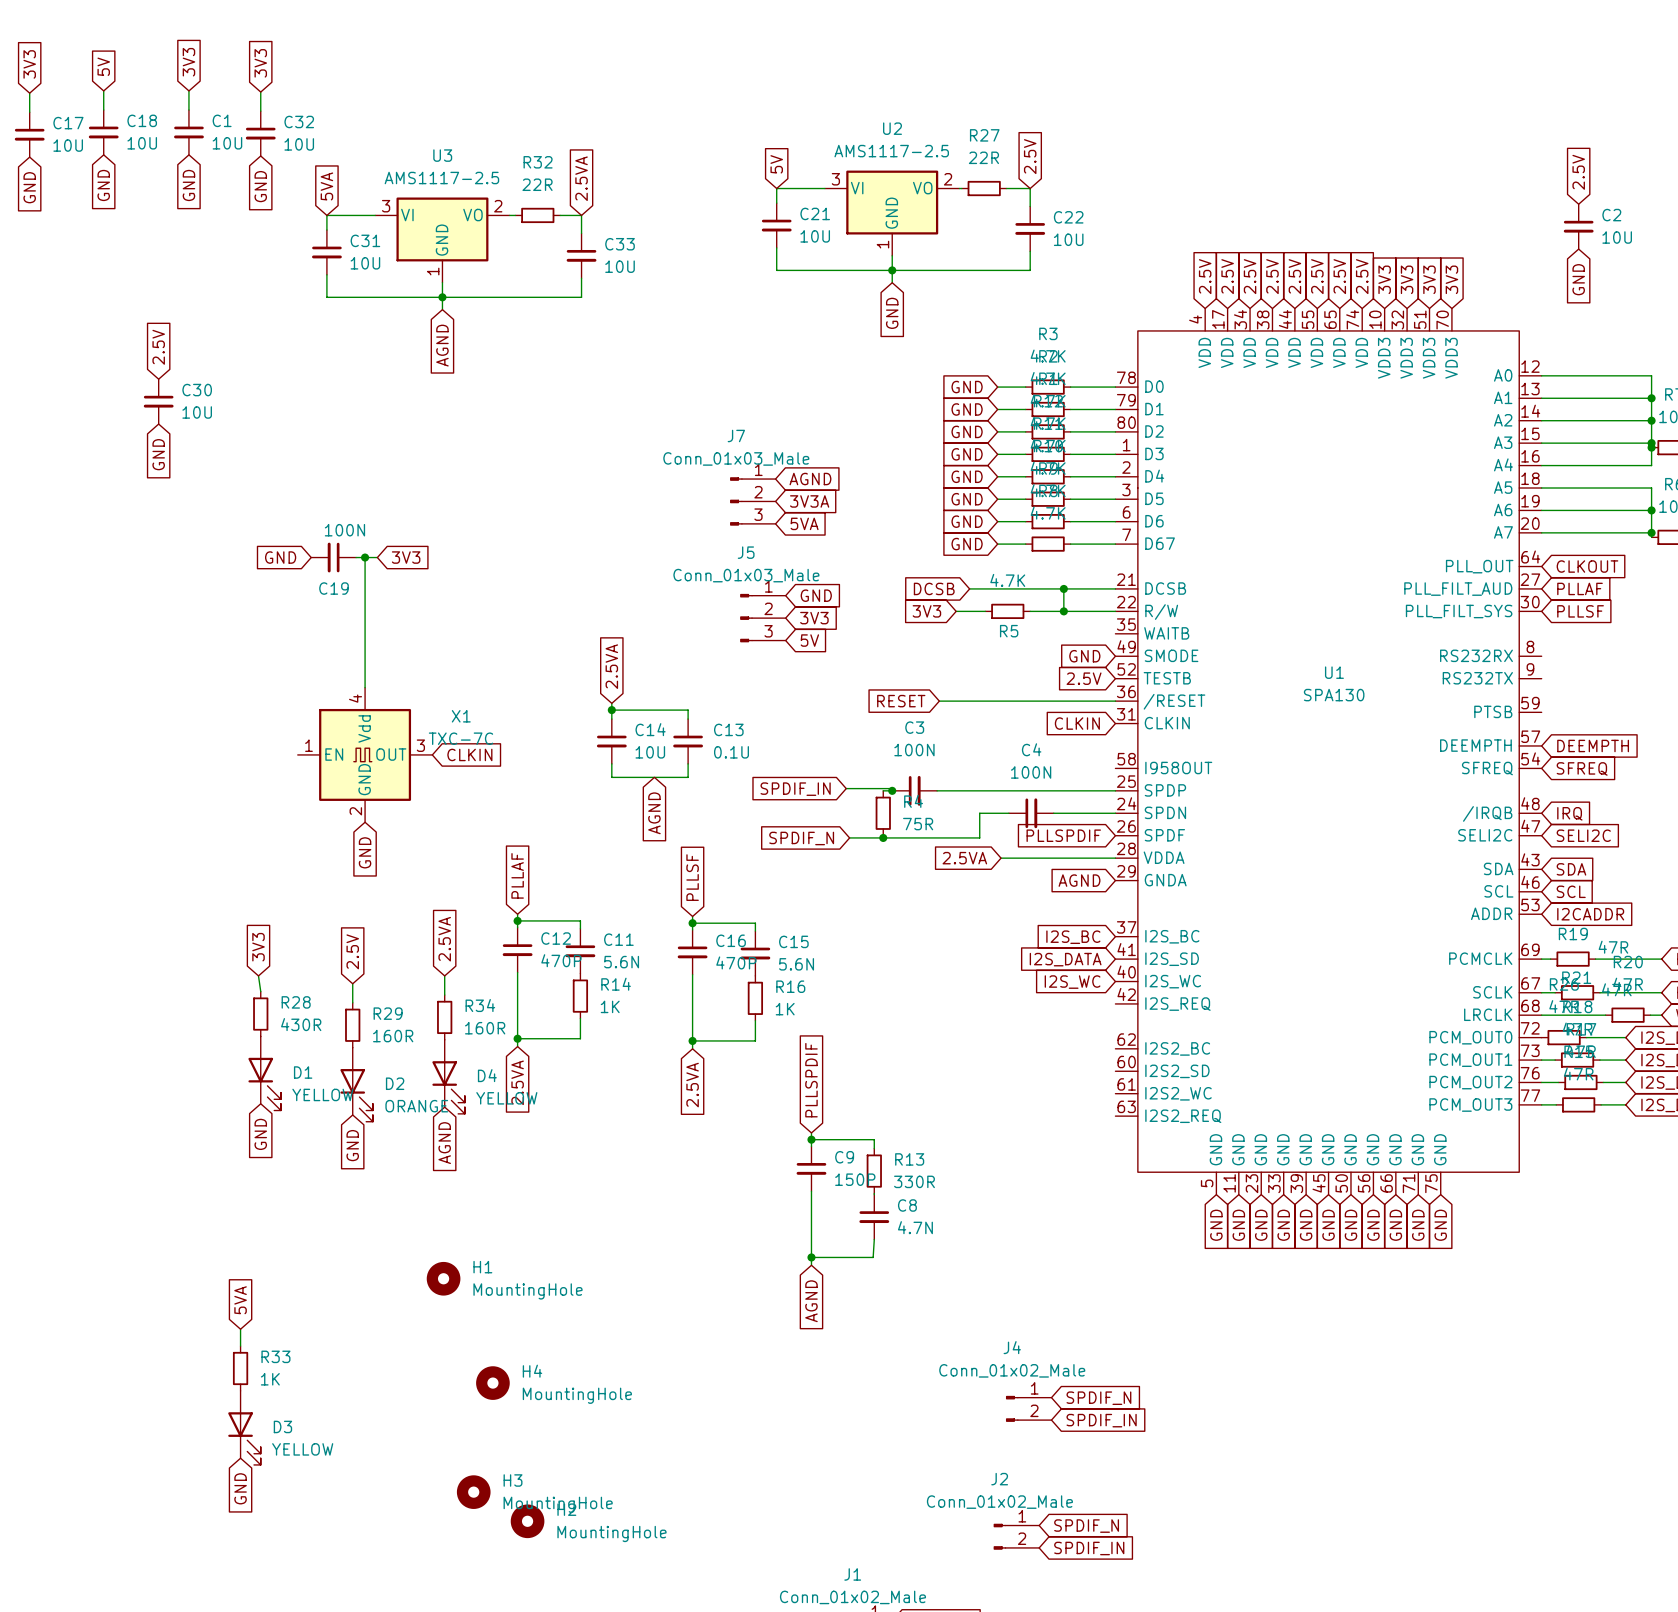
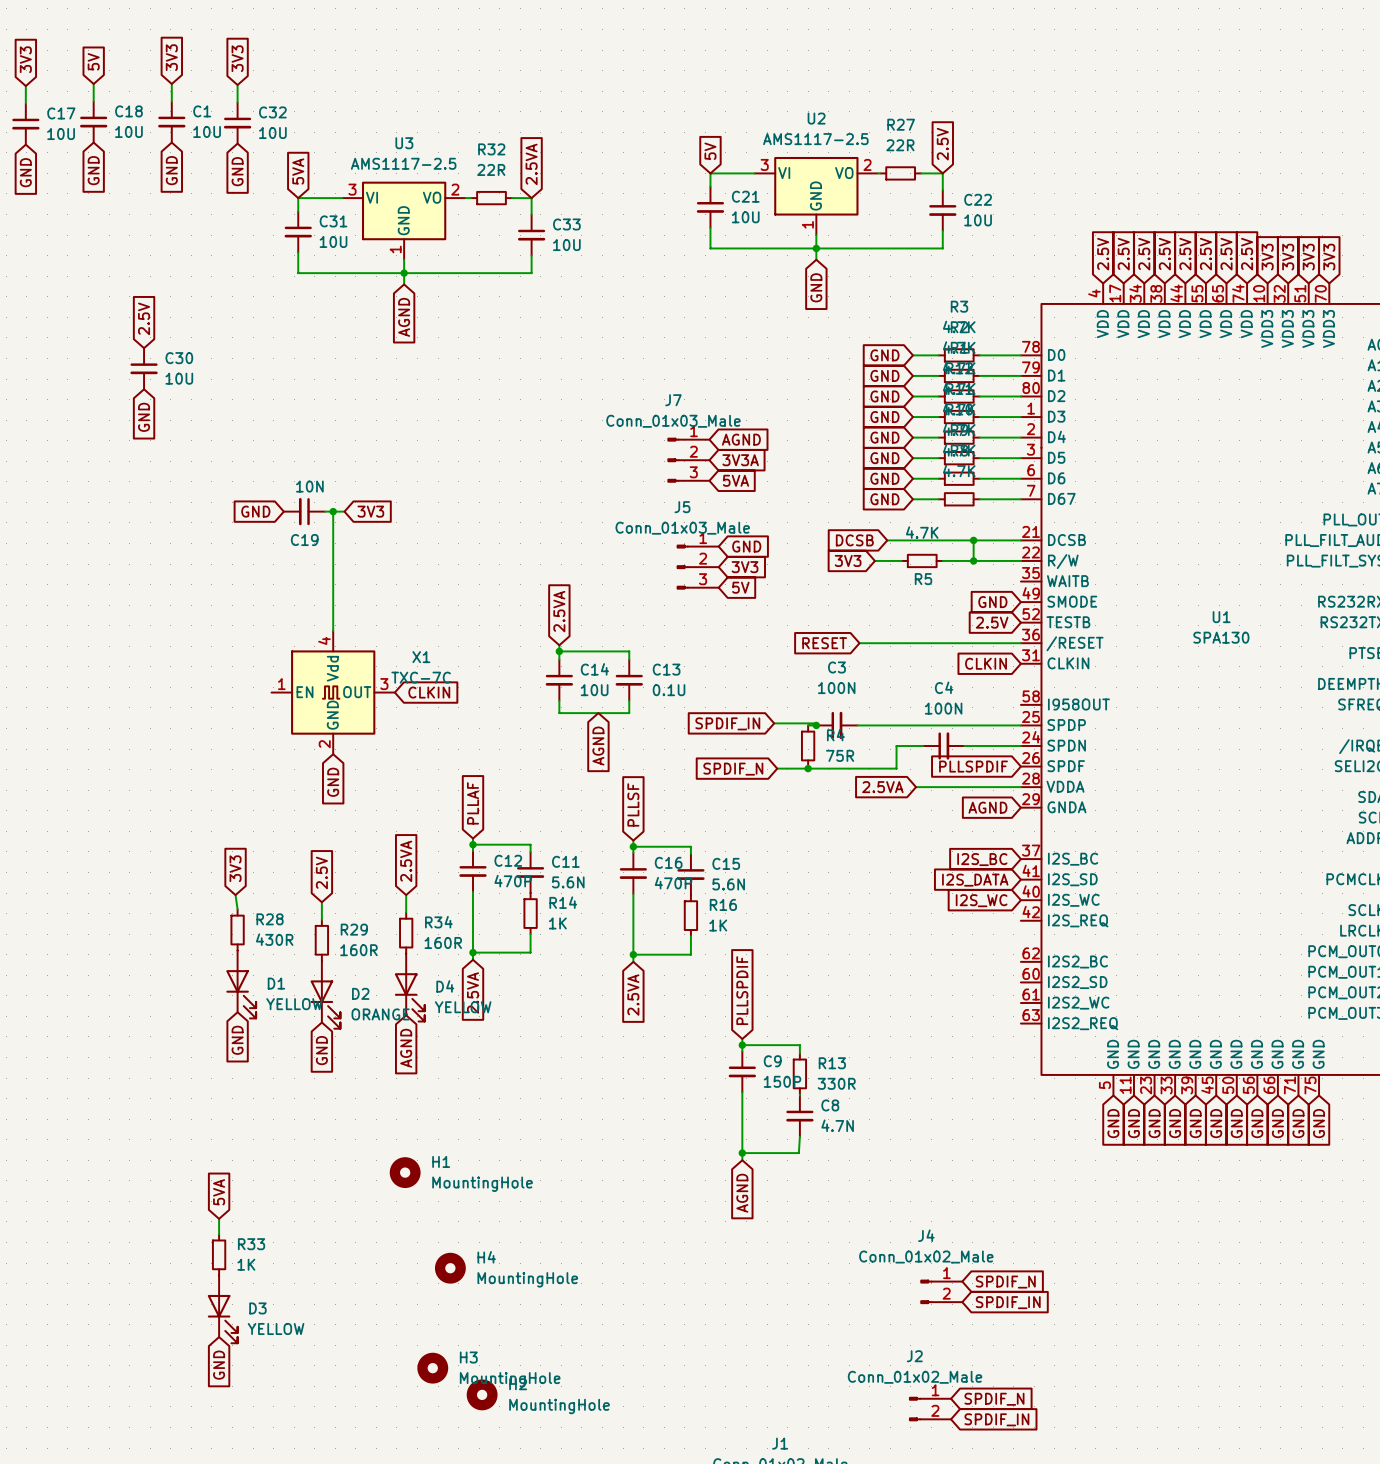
C19 value: 100N (344, 530) -> 10N (309, 486)

